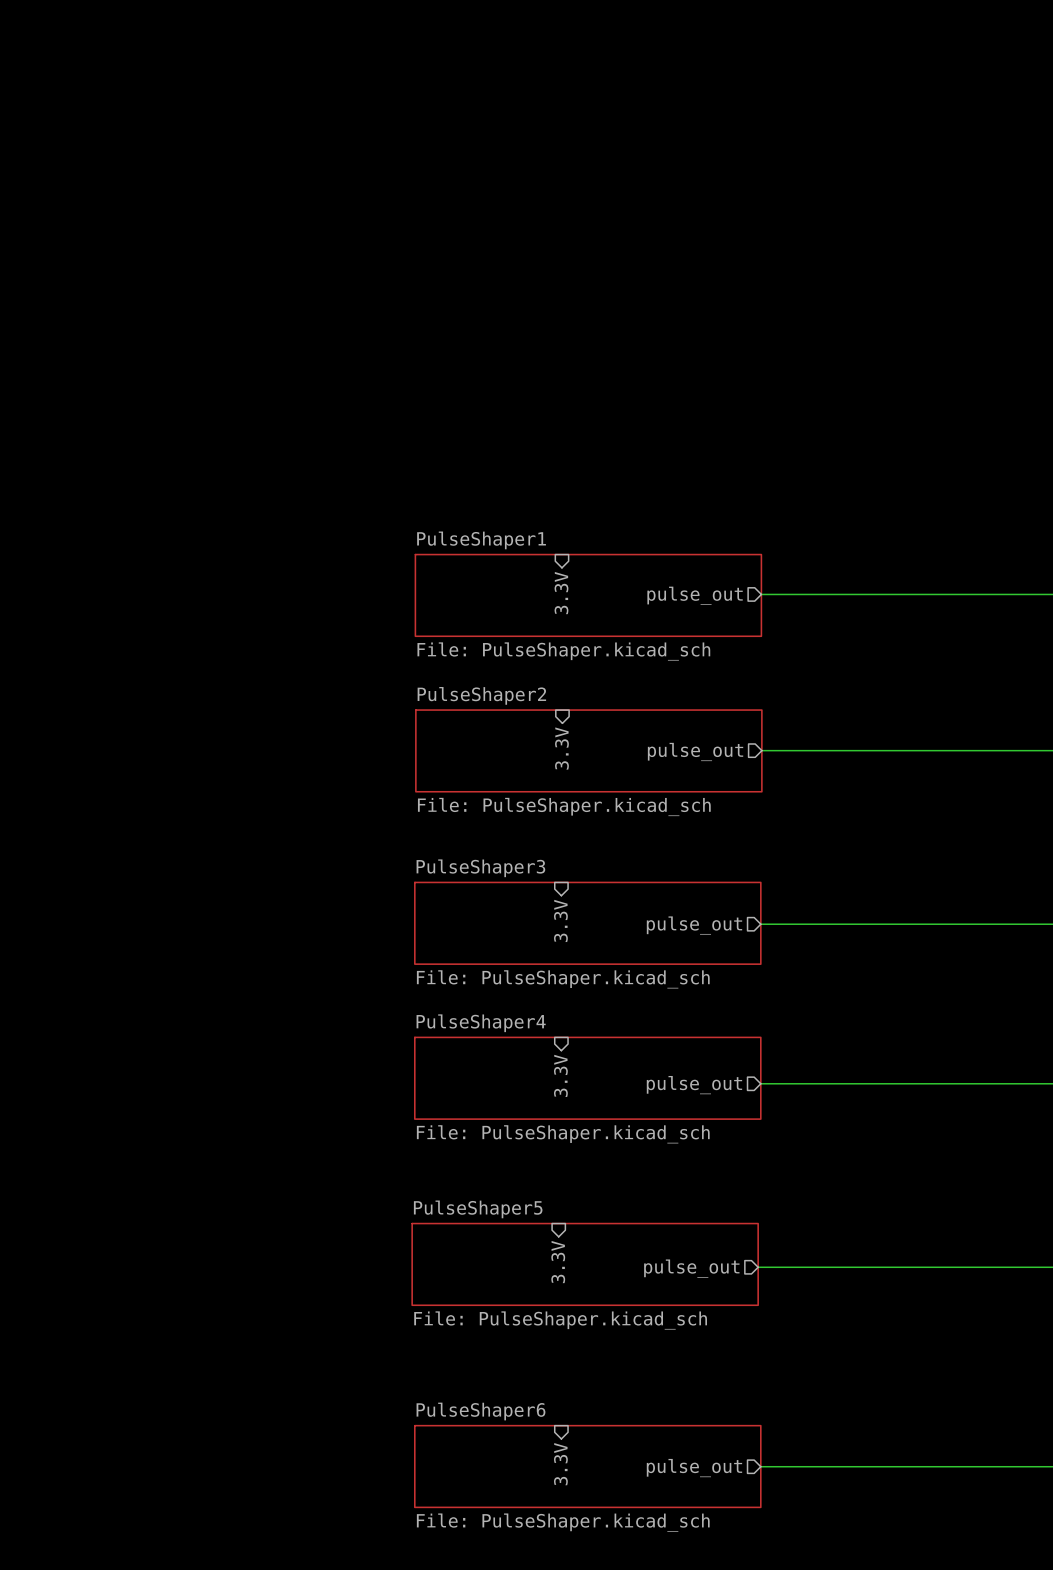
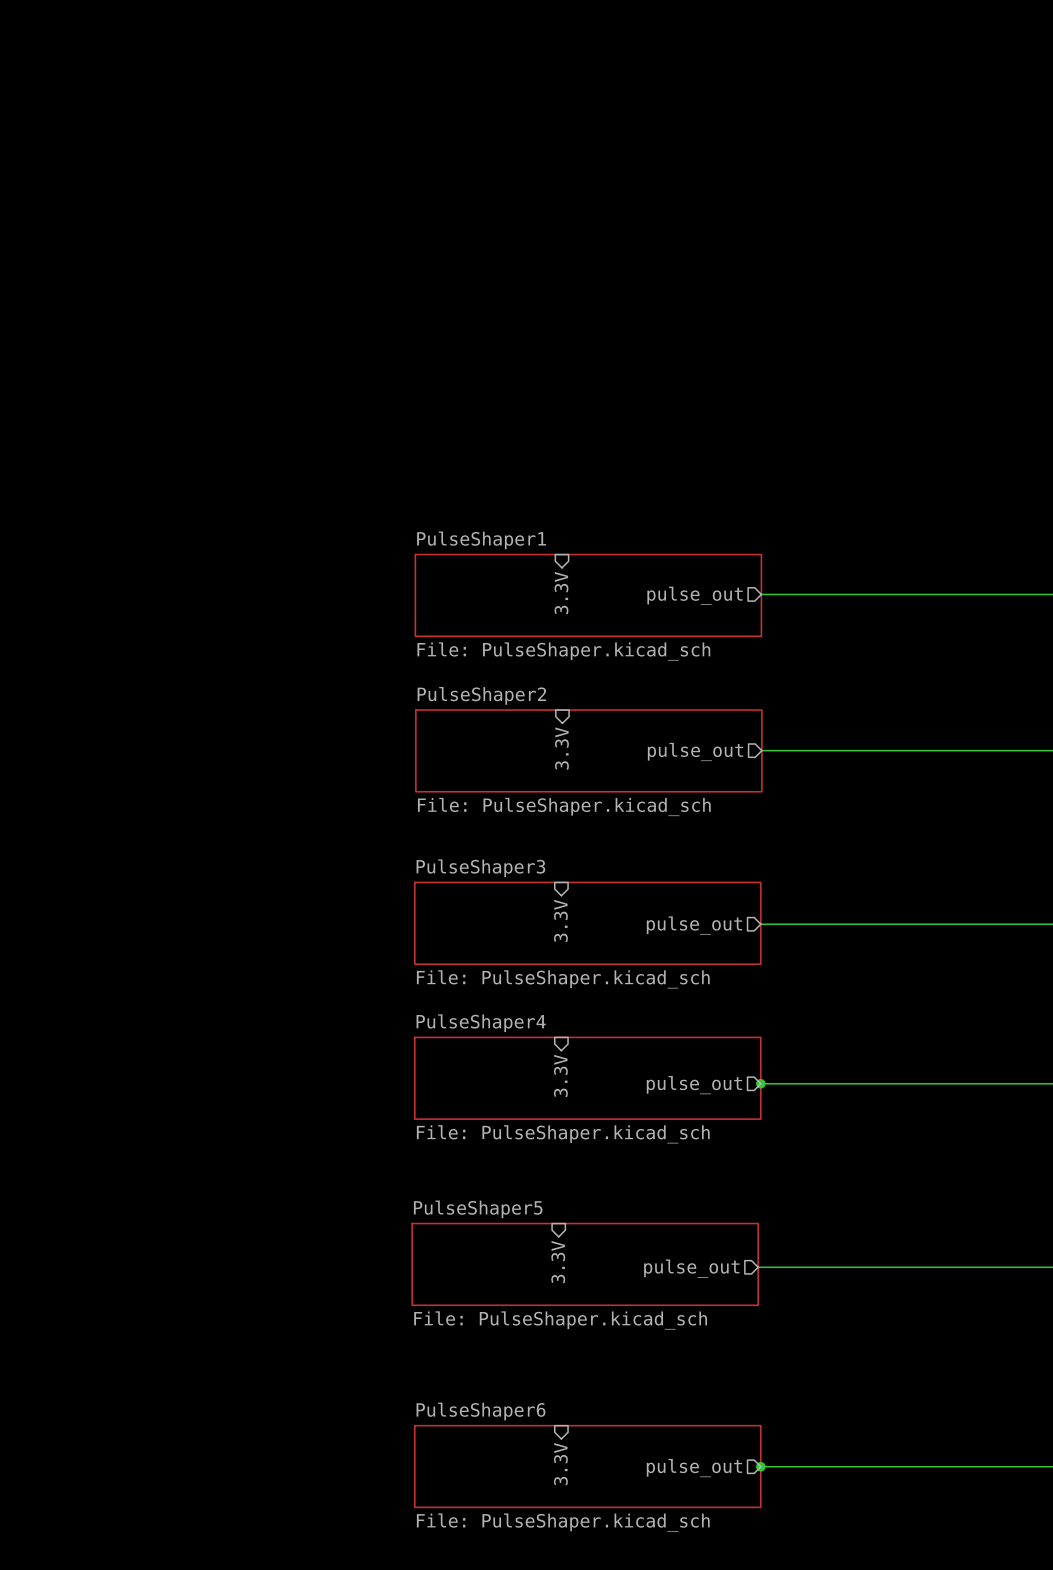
junction: none -> (760, 1083)
junction: none -> (760, 1466)

